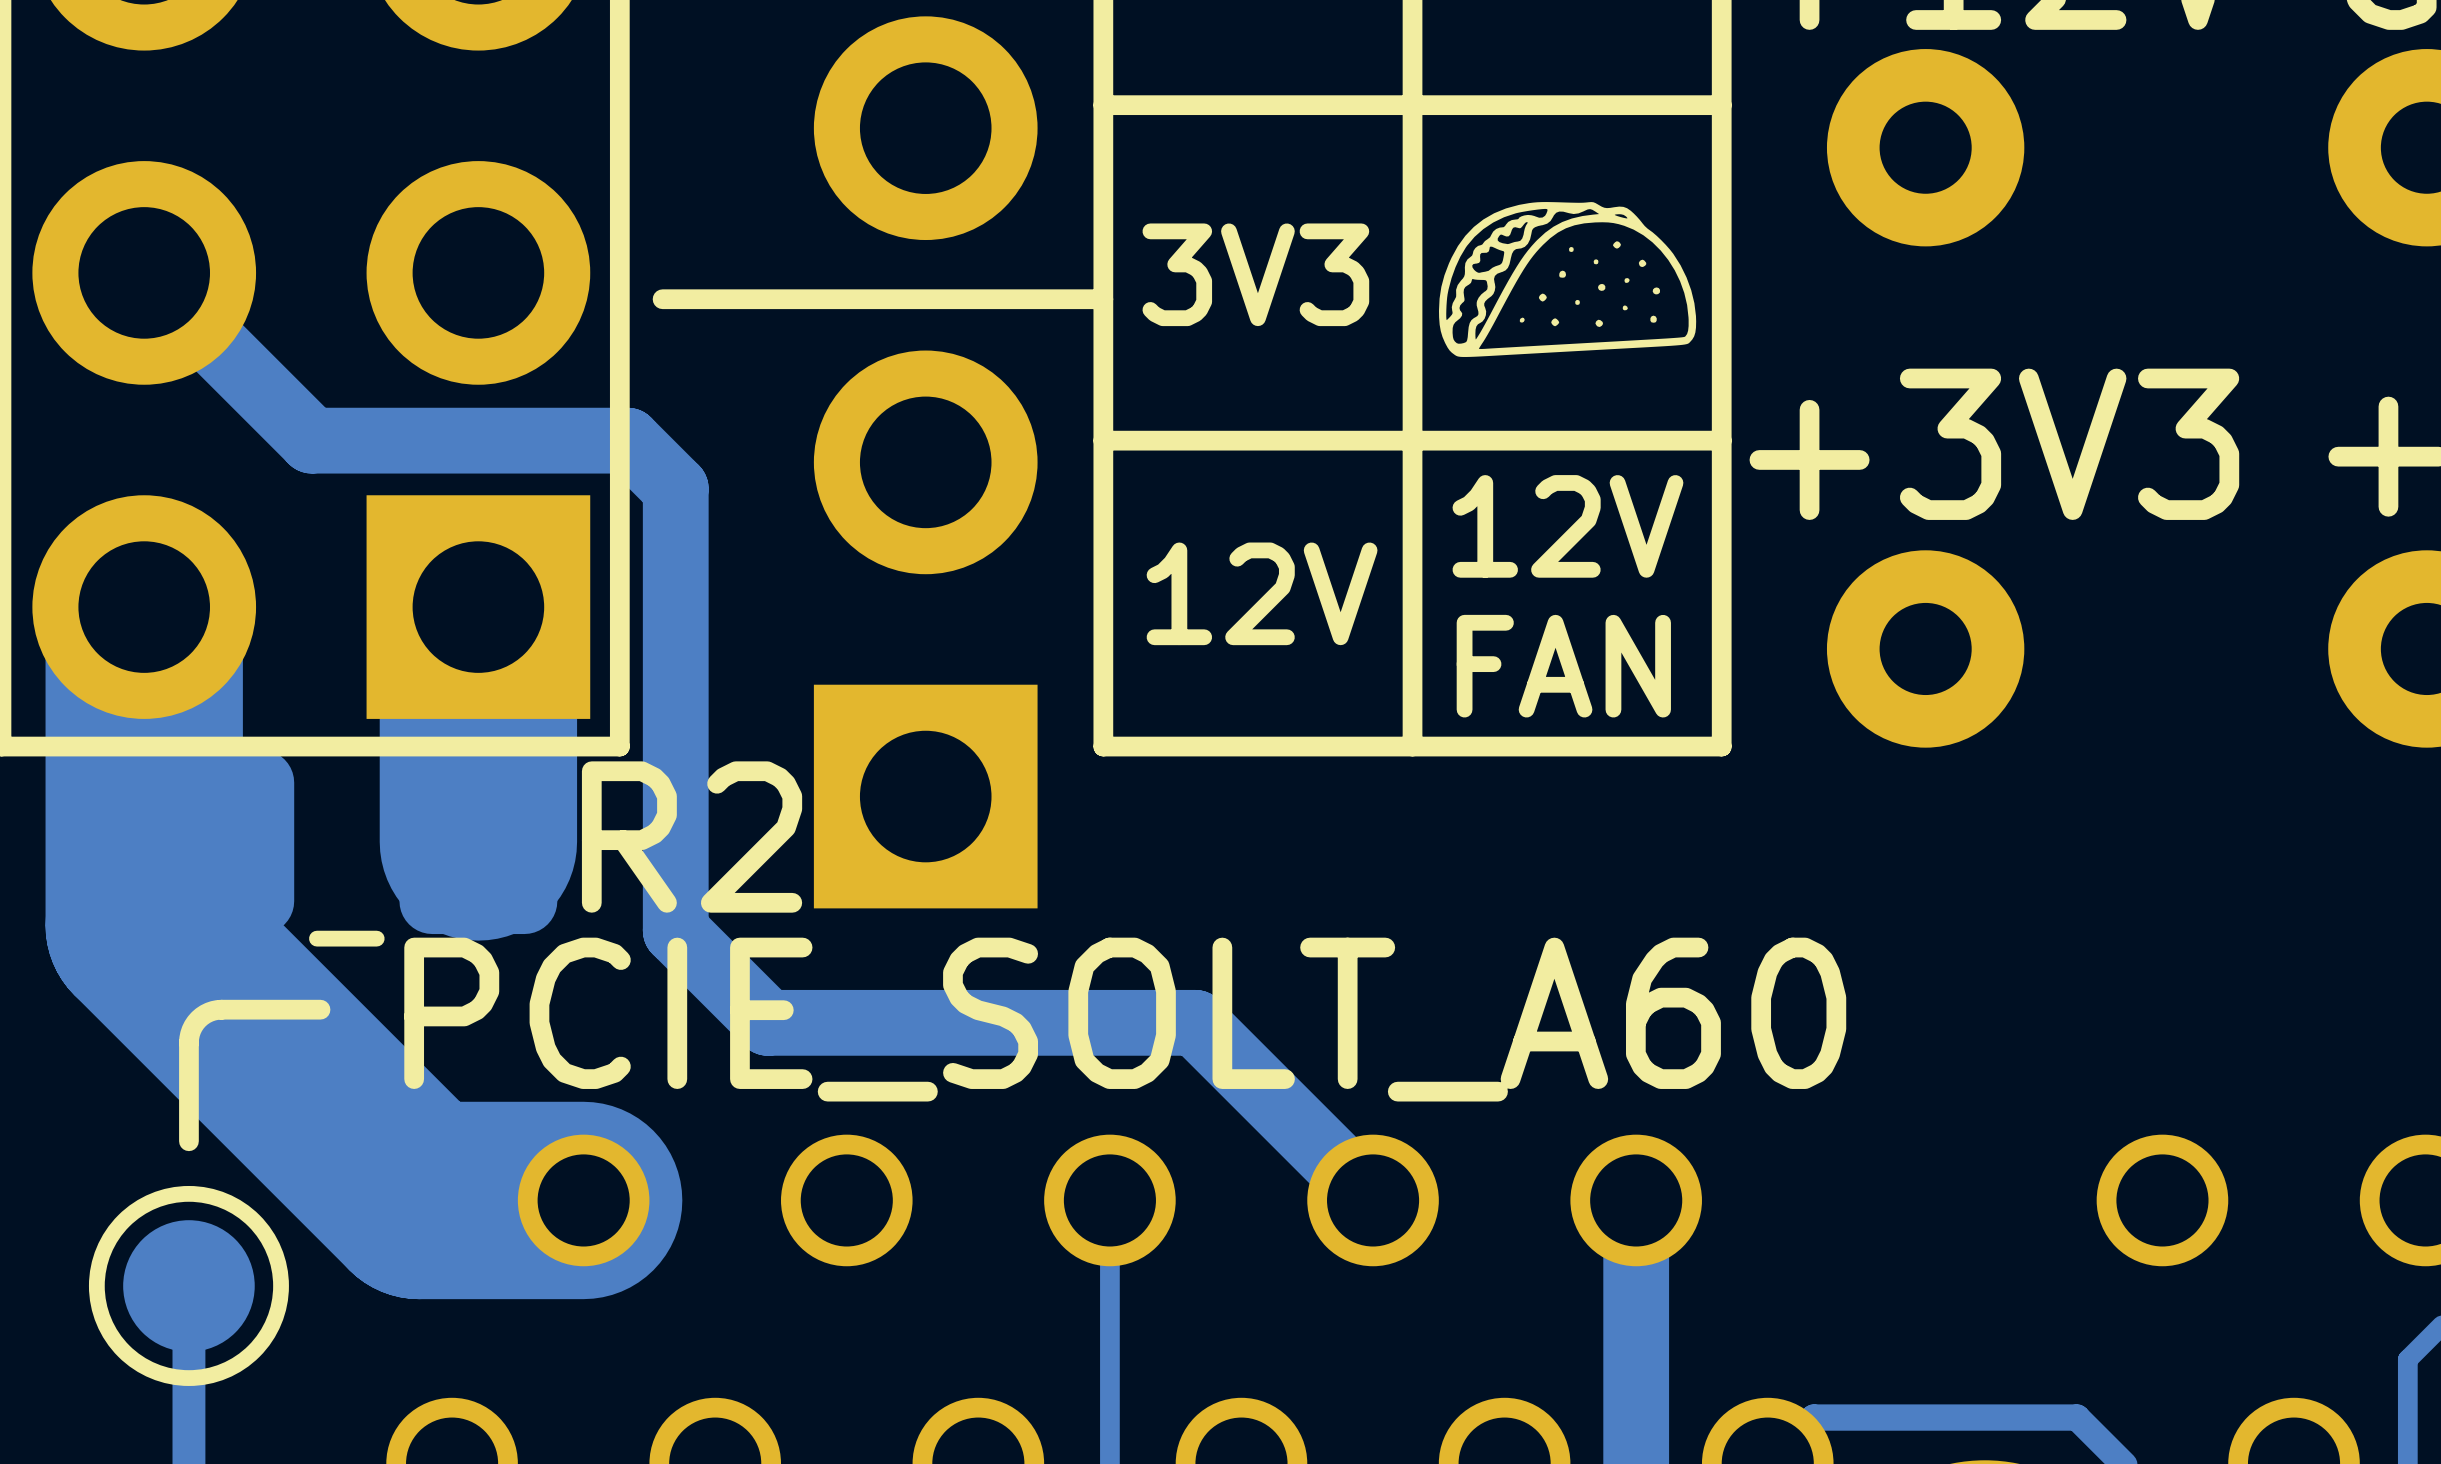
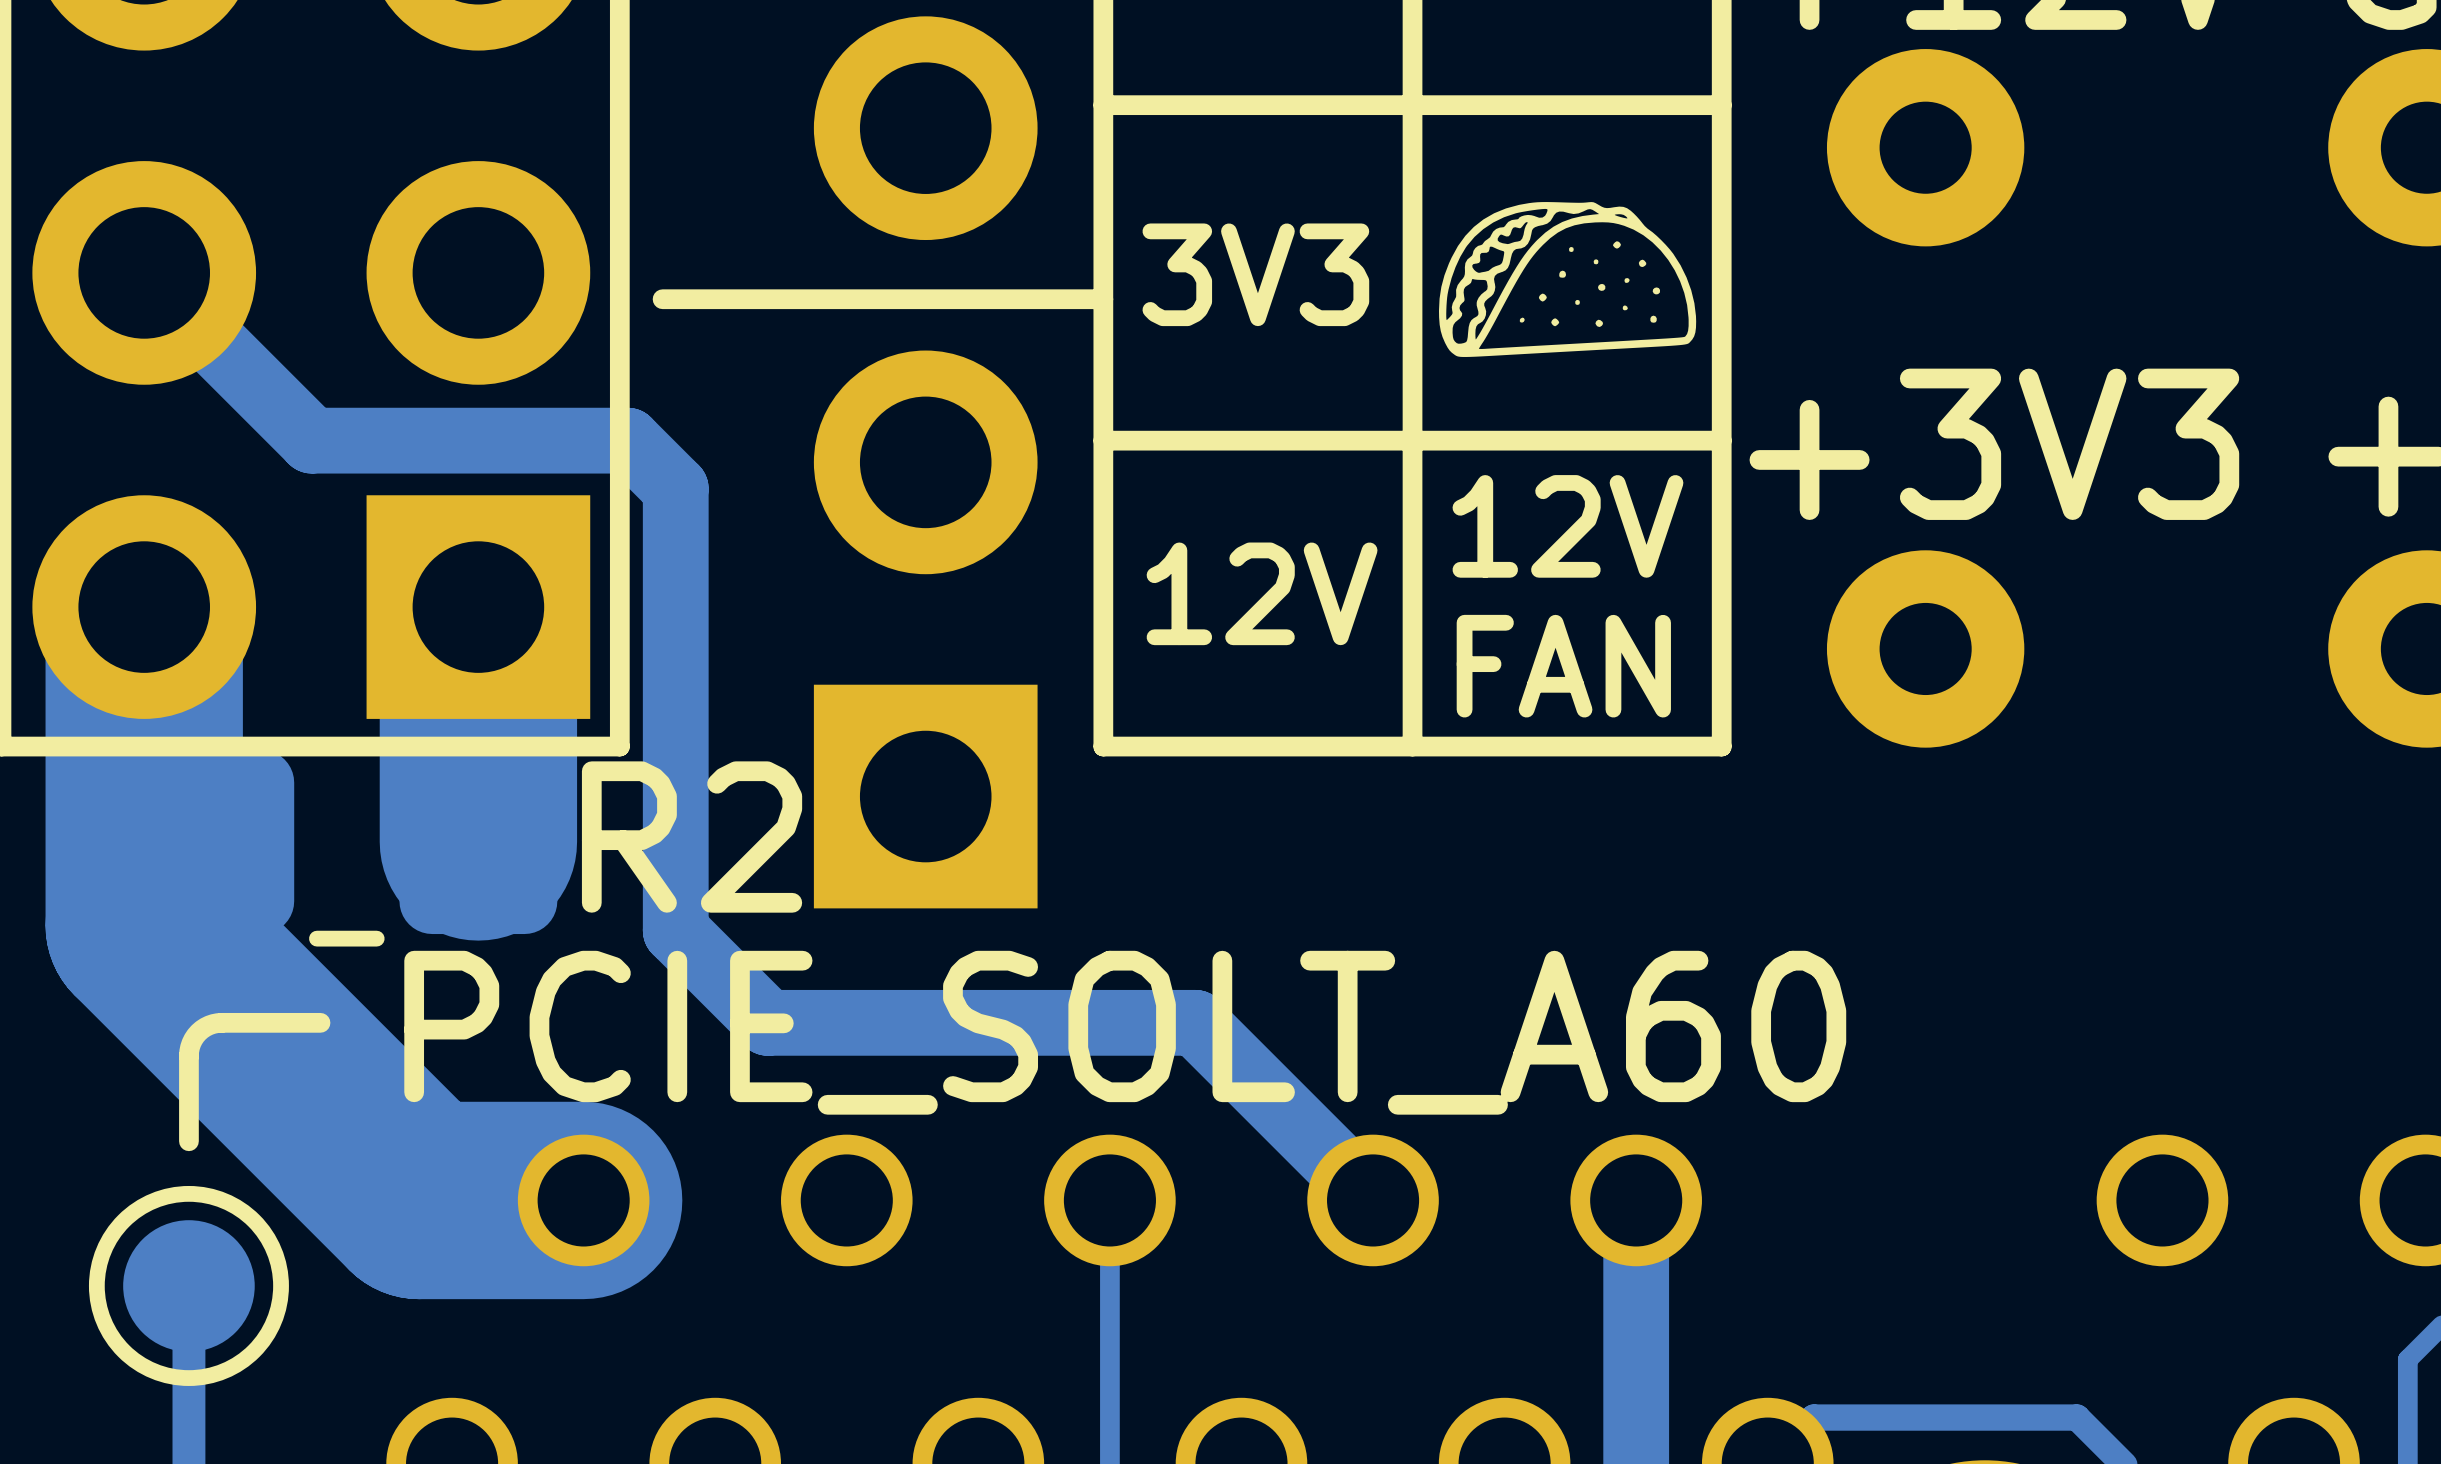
line: (320, 1009) (221, 1009) (209, 1012) (198, 1019) (191, 1029) (188, 1055) -> (320, 1022) (213, 1023) (205, 1027) (195, 1035) (191, 1043) (188, 1055)
text position: PCIE_SOLT_A60 (1125, 1019) -> PCIE_SOLT_A60 (1125, 1032)

